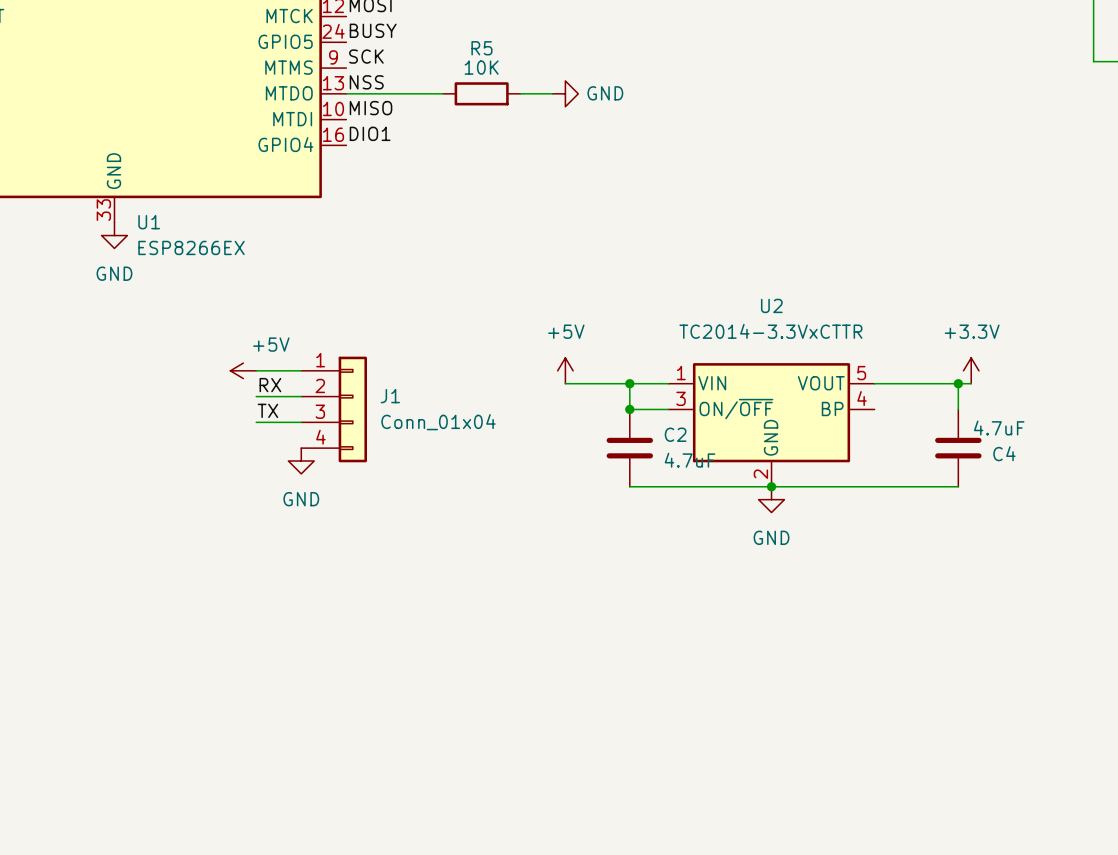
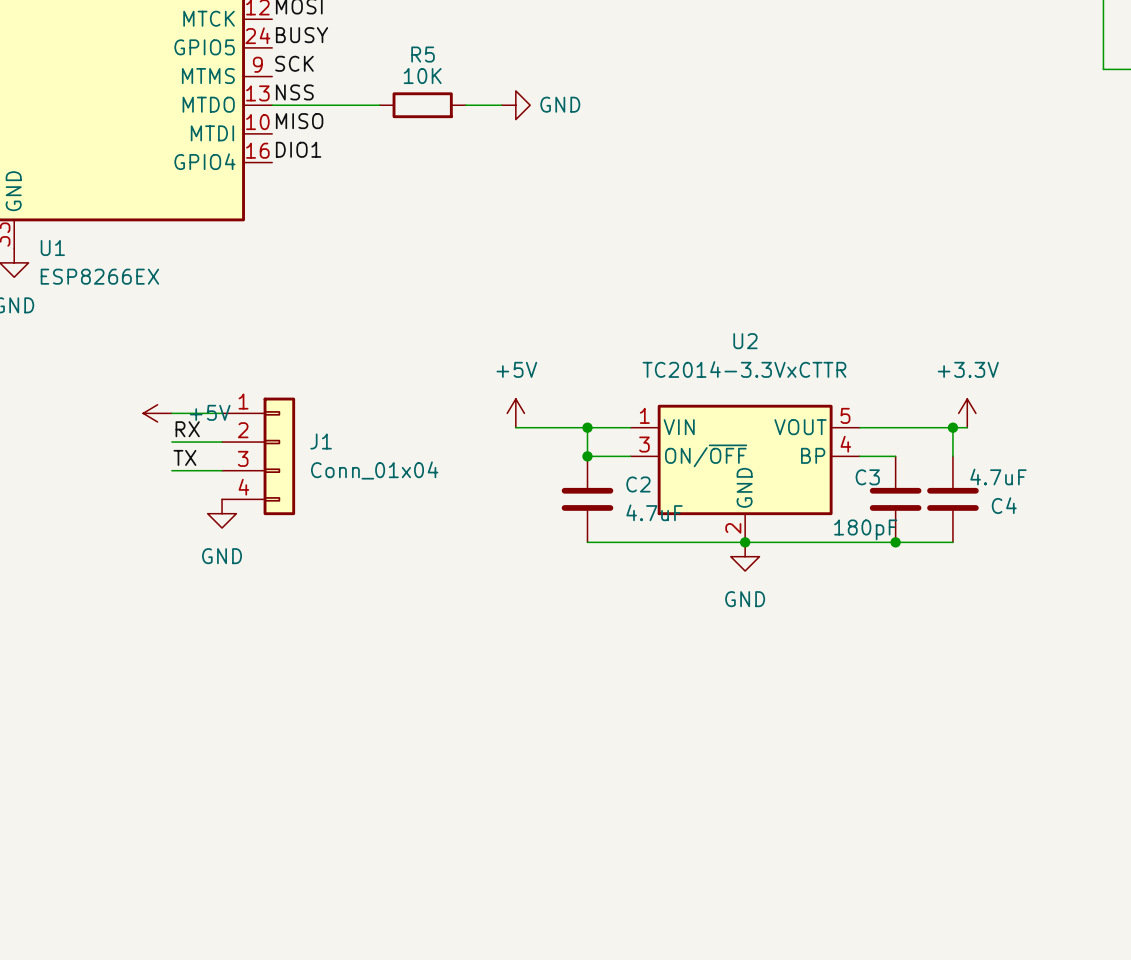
power symbol text position: +5V (271, 344) -> +5V (210, 412)
wire: none -> (859, 456) (895, 456)
C3: none -> 180pF (895, 499)
junction: none -> (895, 542)

